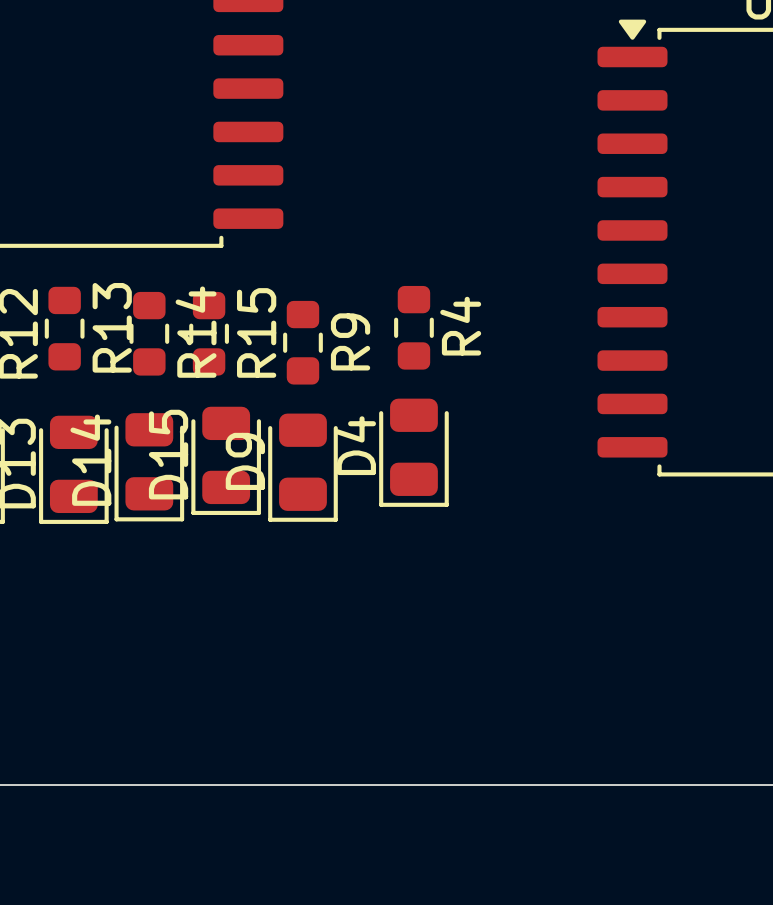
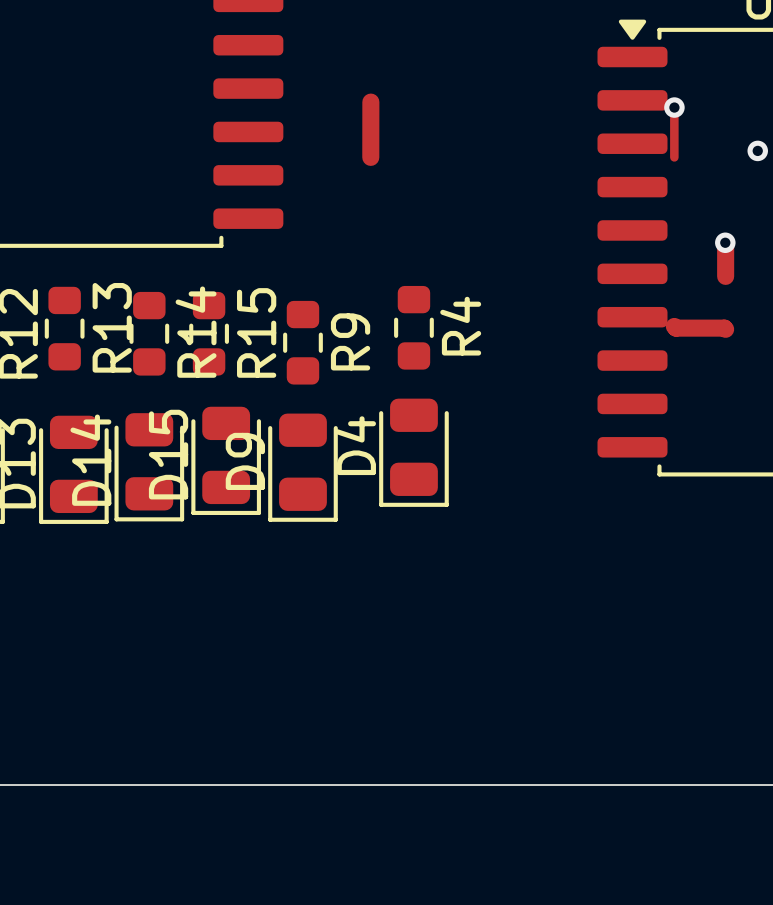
track: none -> (370, 102) (370, 157)
track: none -> (674, 107) (674, 157)
via: none -> (674, 107)
via: none -> (757, 150)
via: none -> (725, 242)
track: none -> (725, 243) (725, 276)
track: none -> (674, 326) (676, 328) (725, 329)

